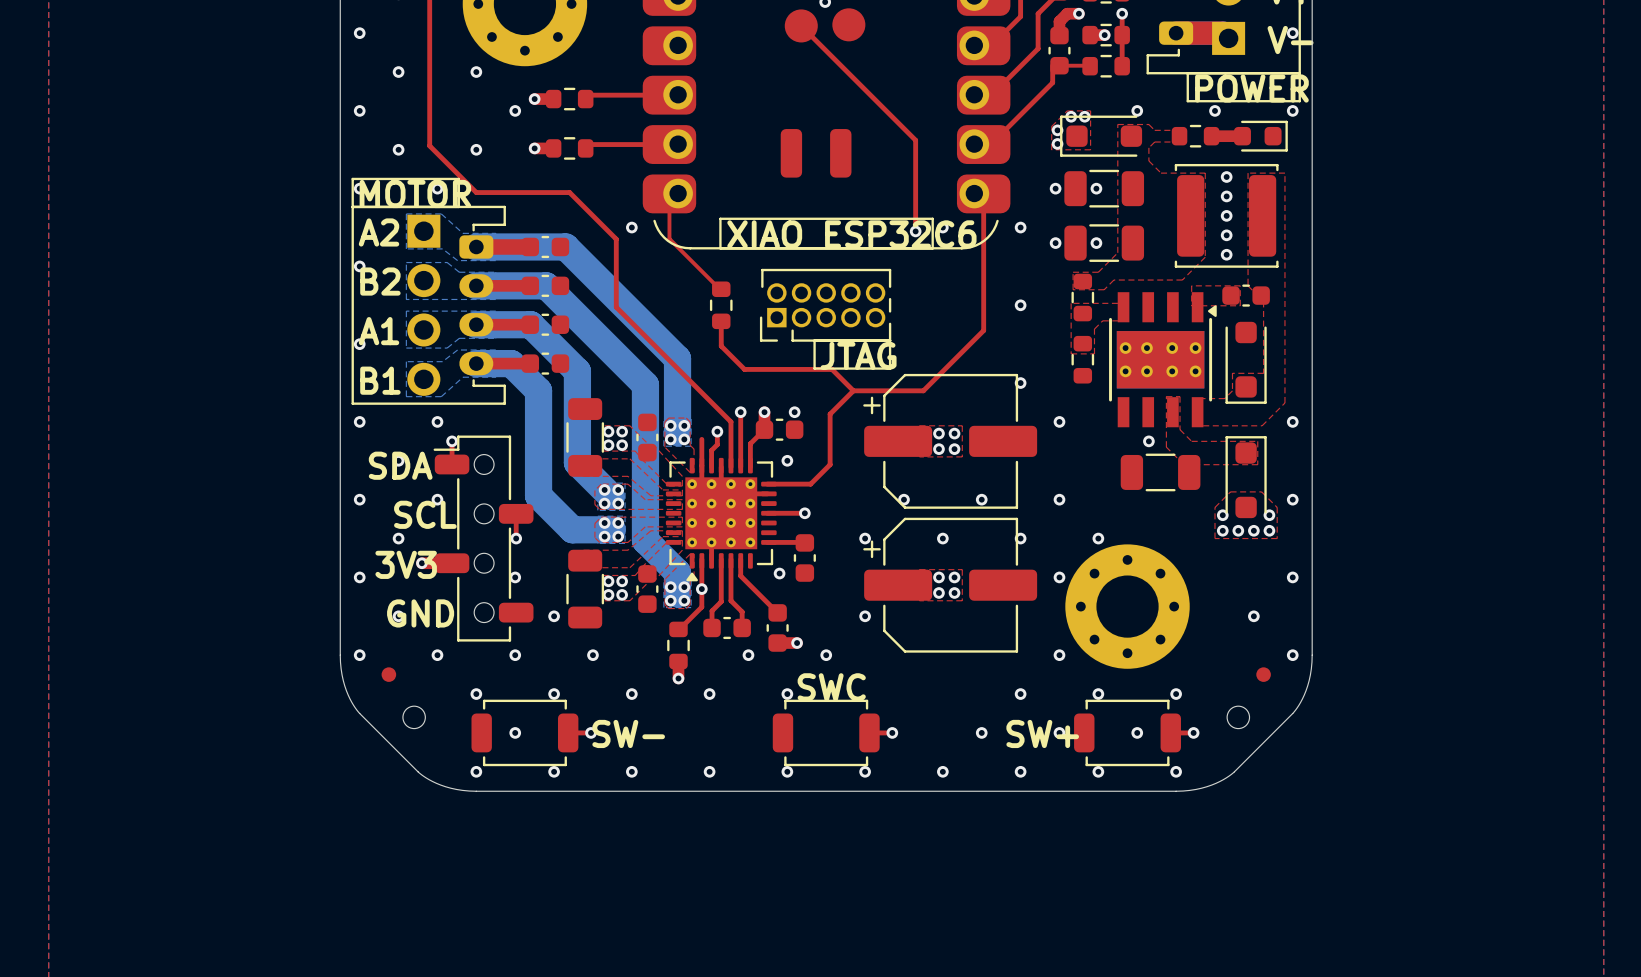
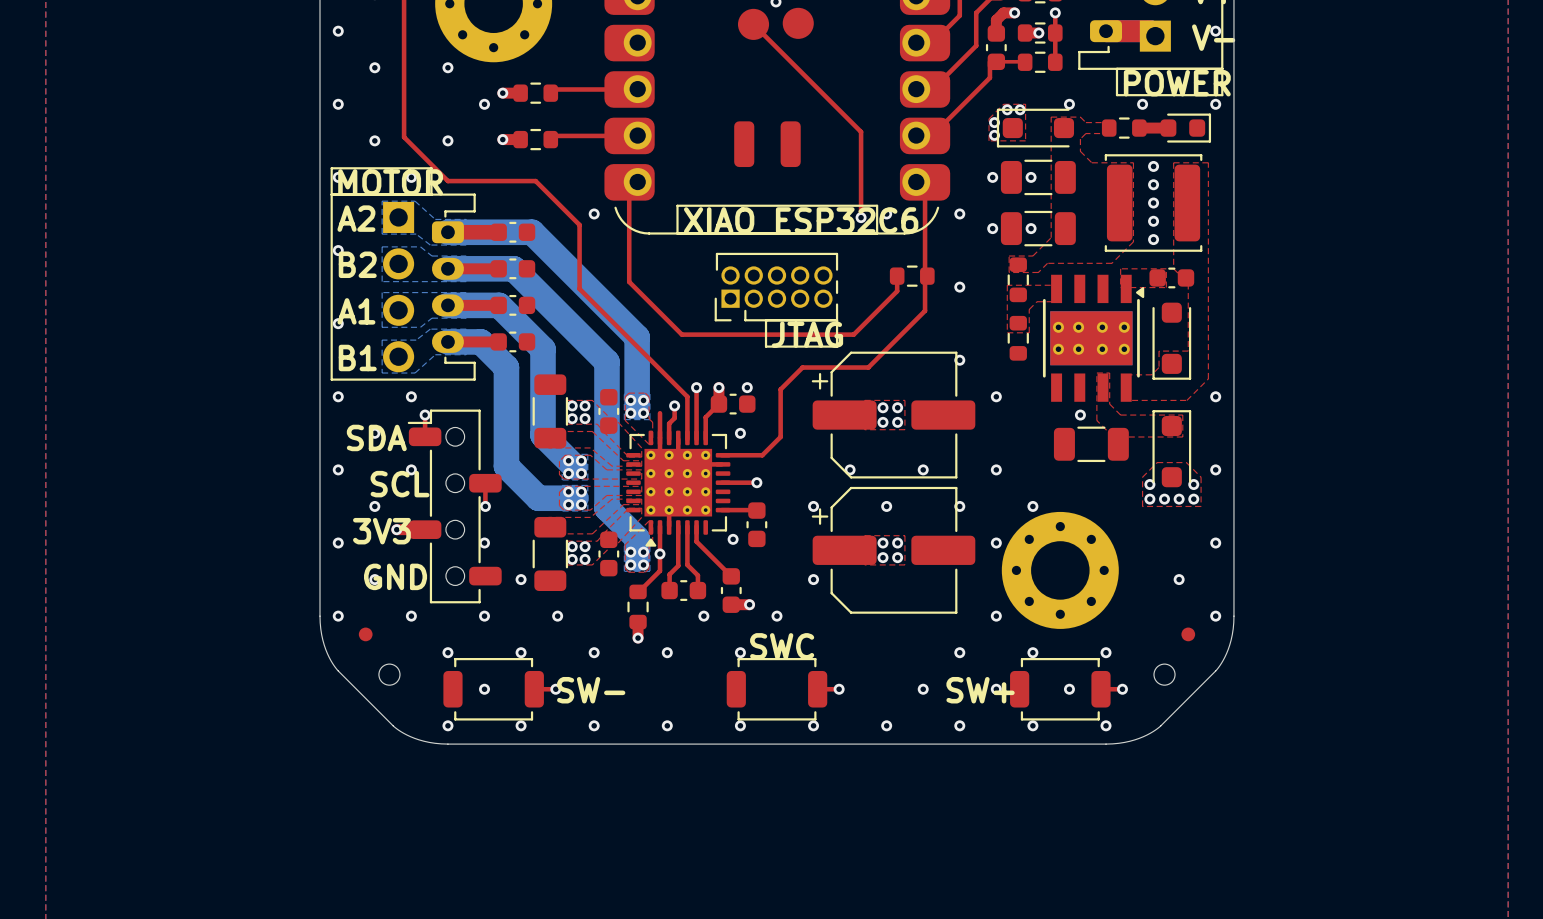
top track: none -> (629, 182) (629, 281) (681, 334) (853, 334) (897, 291) (897, 276)
top track: (678, 193) (669, 193) (669, 238) (721, 289) -> none
part rotation: 0° (721, 305) -> 90° clockwise (912, 276)
part position: (721, 305) -> (912, 276)
top track: (721, 321) (721, 346) (744, 369) (832, 369) (853, 390) -> none

